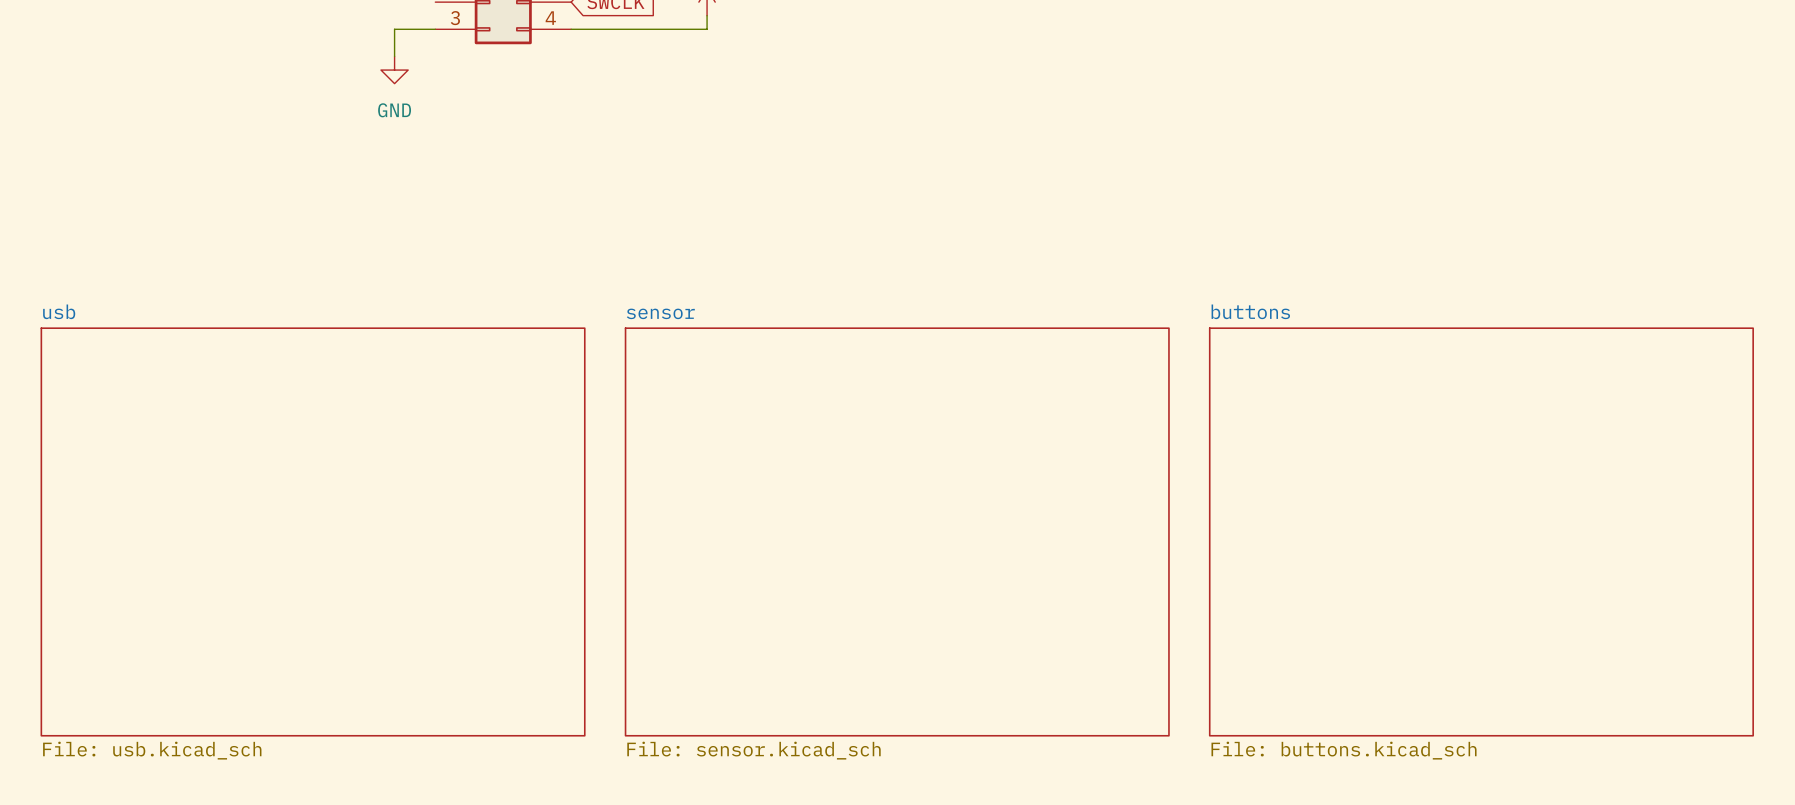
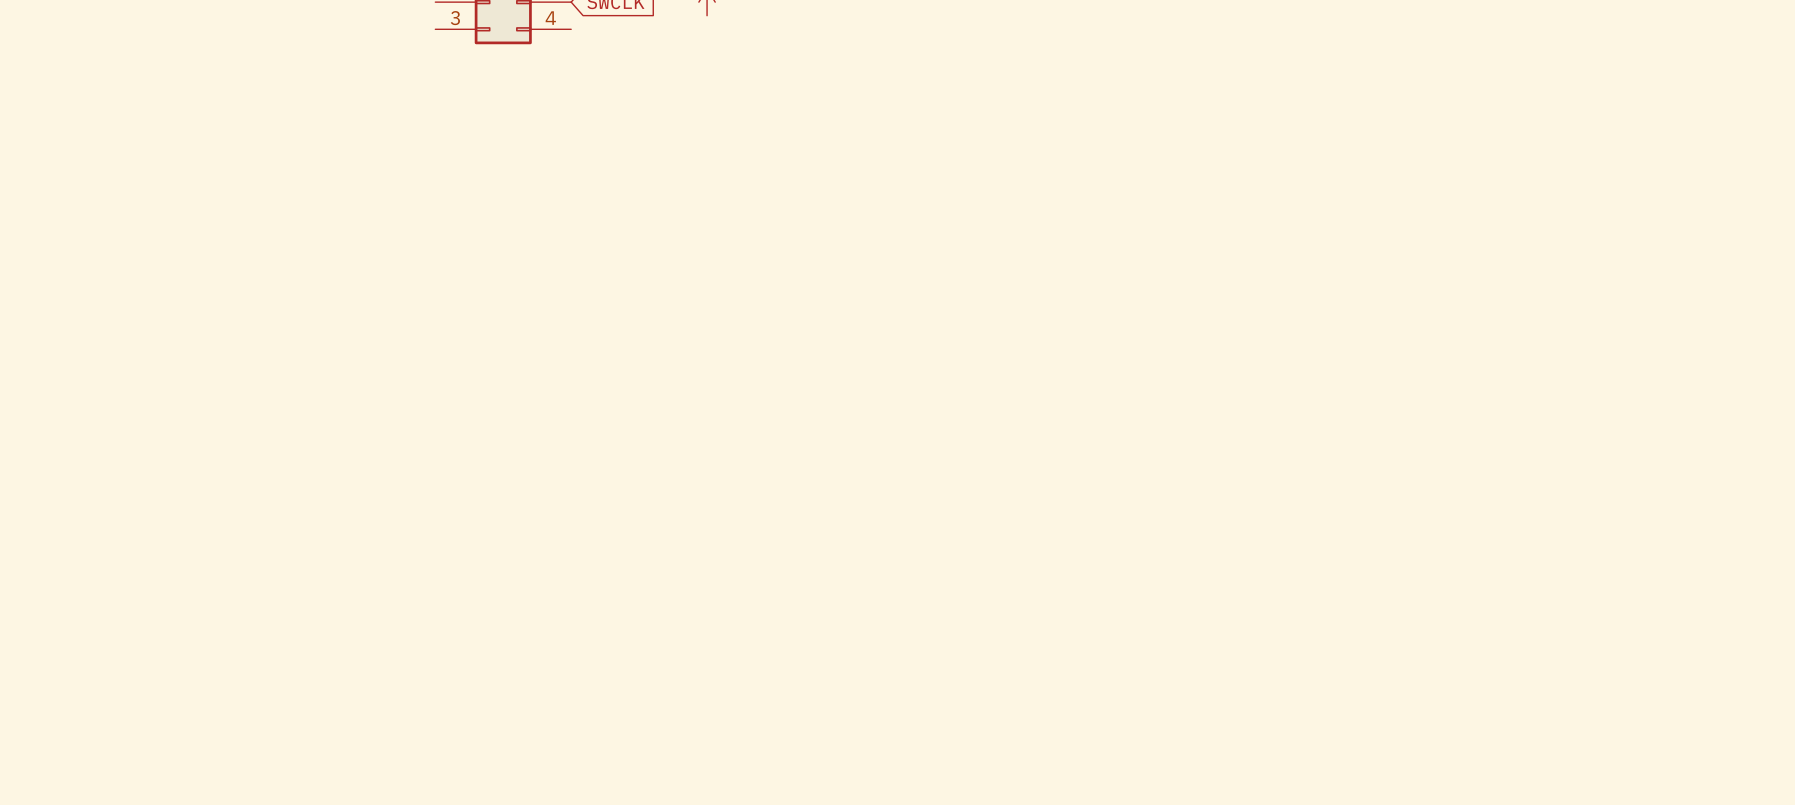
wire: (707, 15) (707, 29) (571, 29) -> none
wire: (435, 29) (394, 29) (394, 56) -> none
power symbol: GND (394, 70) -> none
sheet usb: File: usb.kicad_sch (313, 531) -> none
sheet sensor: File: sensor.kicad_sch (897, 531) -> none
sheet buttons: File: buttons.kicad_sch (1481, 531) -> none

